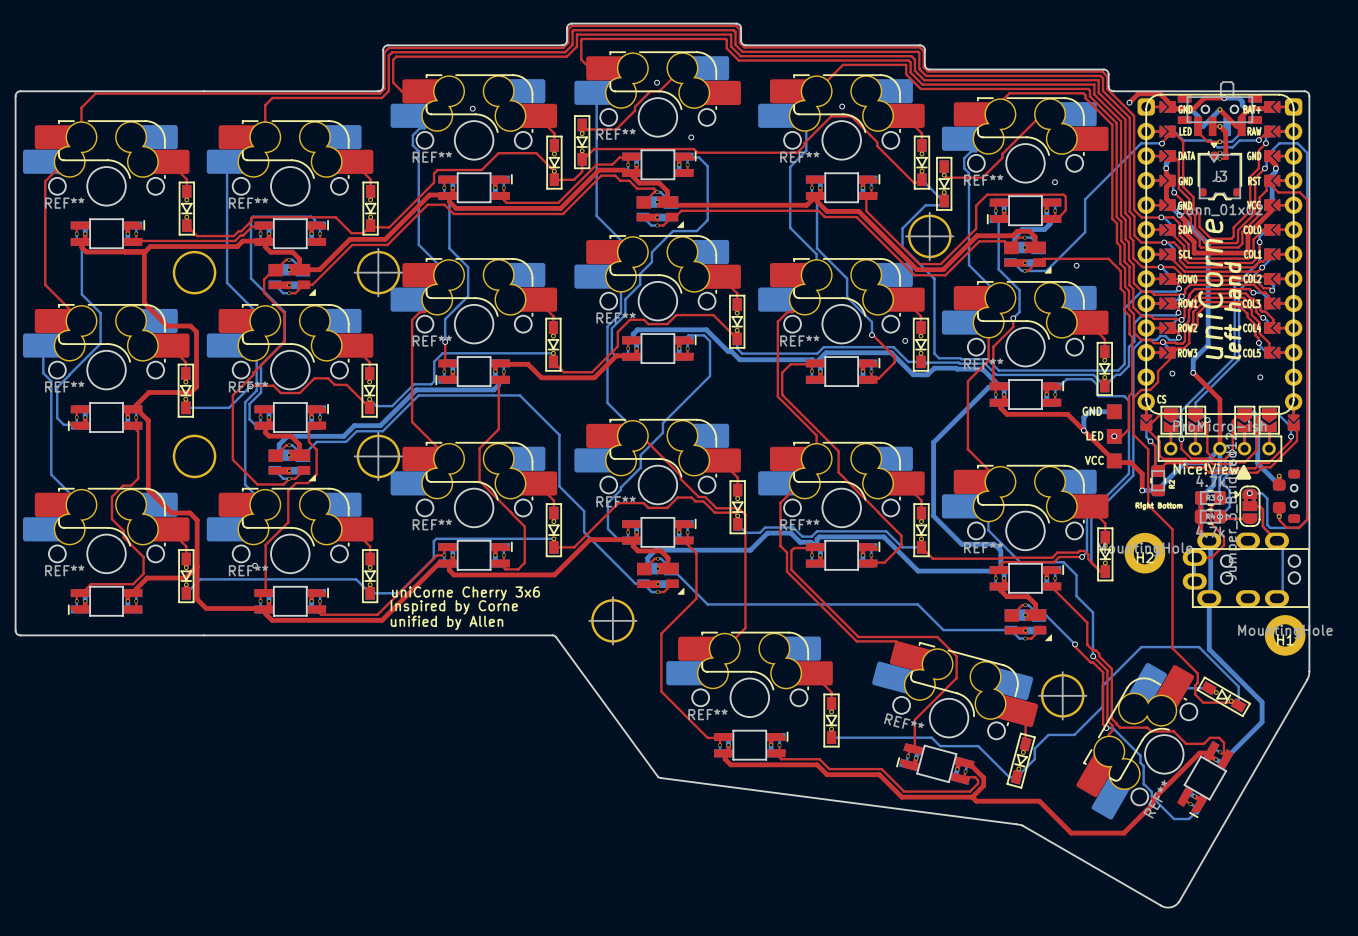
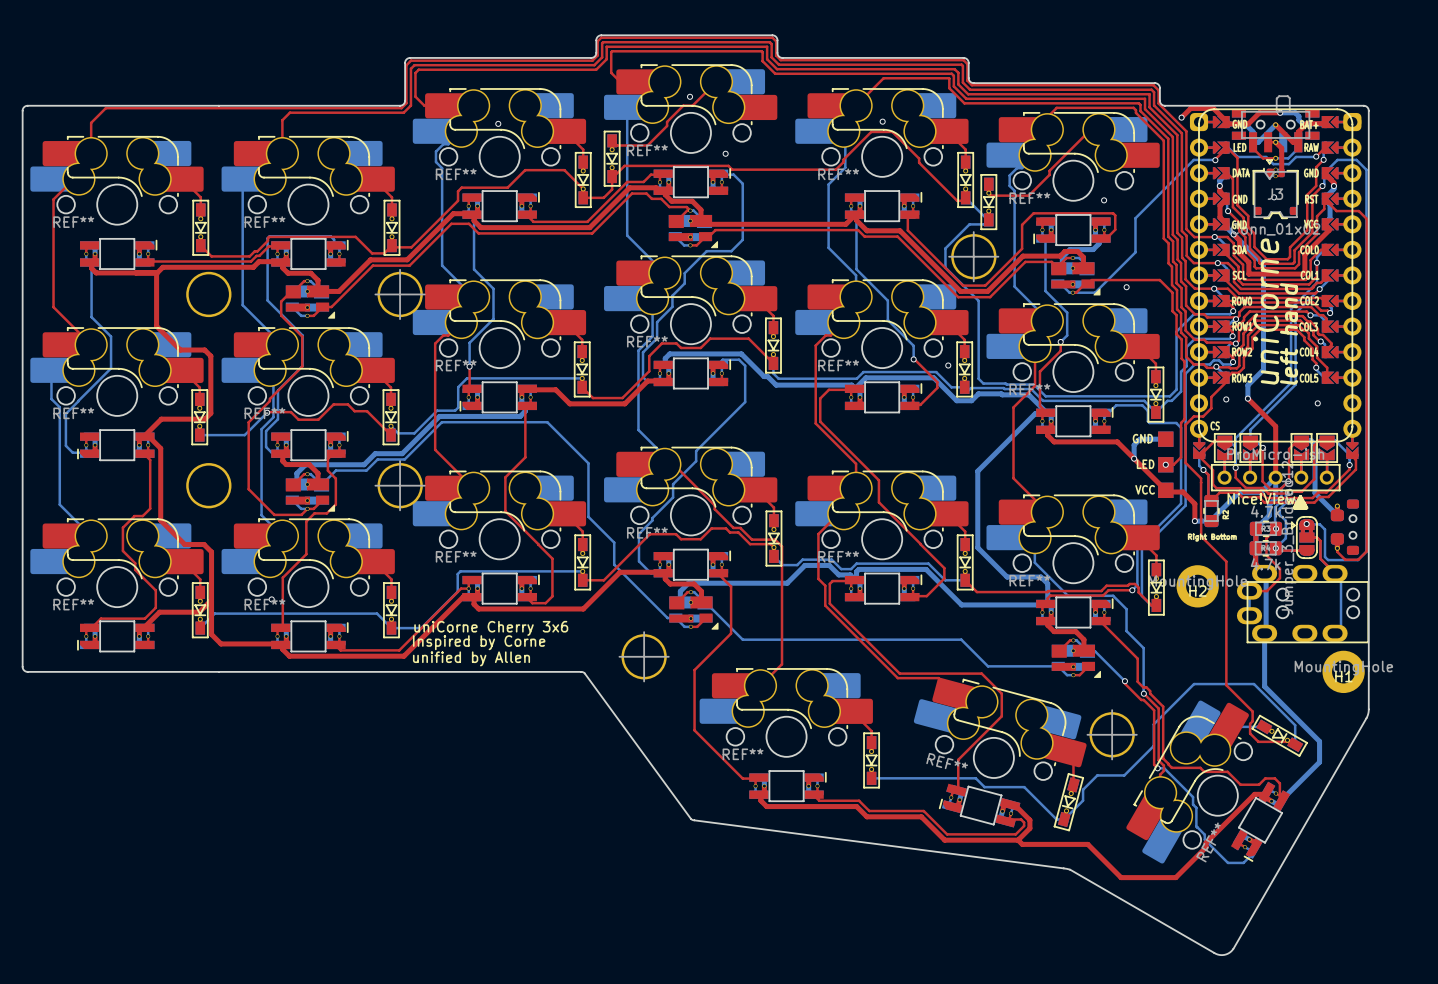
part footprint: [1137, 93, 1303, 431] -> [1189, 108, 1362, 459]

